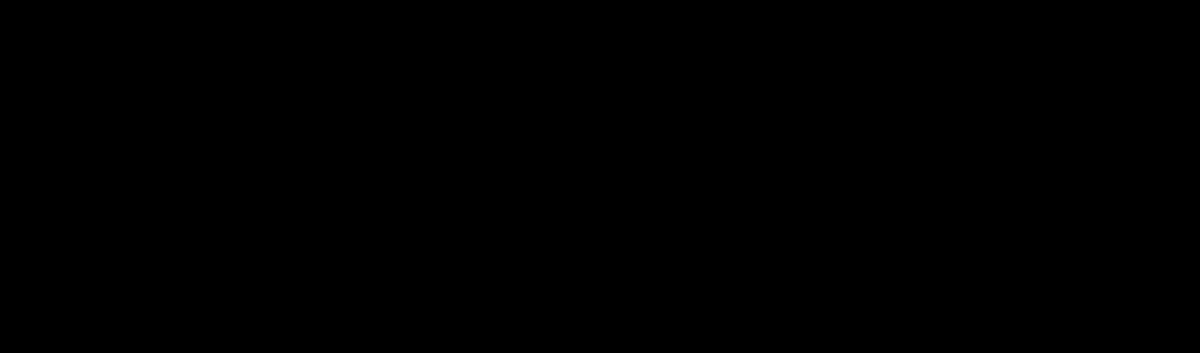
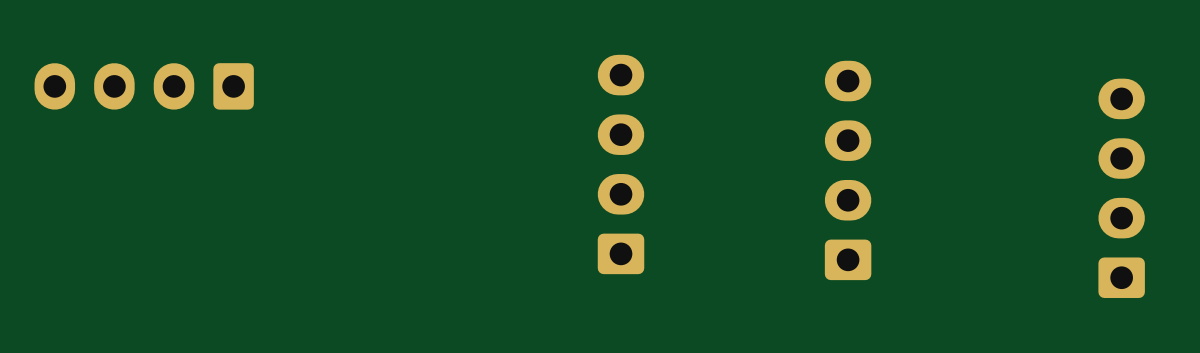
part: none -> (144, 86)
part: none -> (621, 164)
part: none -> (848, 170)
part: none -> (1121, 188)

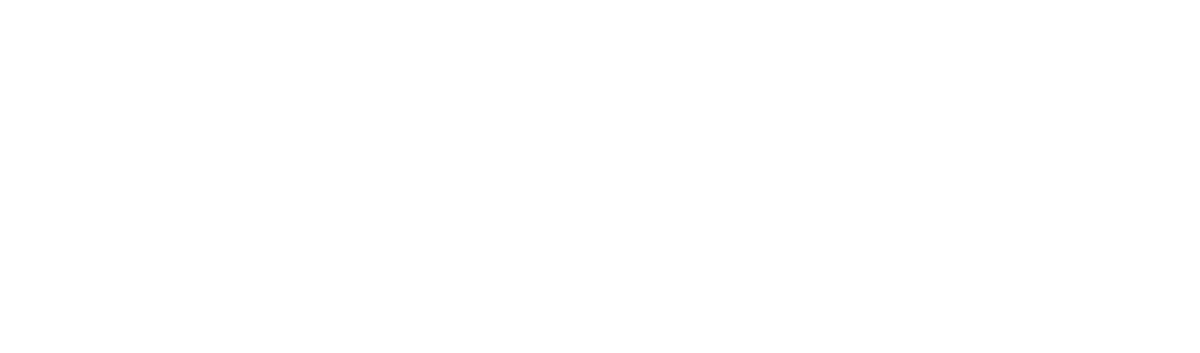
part: (144, 86) -> none
part: (621, 164) -> none
part: (848, 170) -> none
part: (1121, 188) -> none

